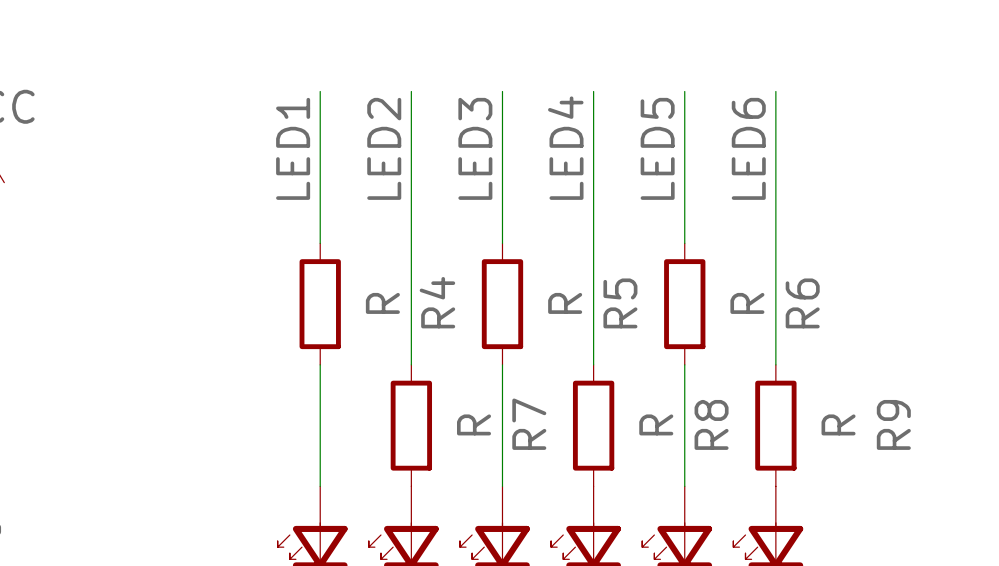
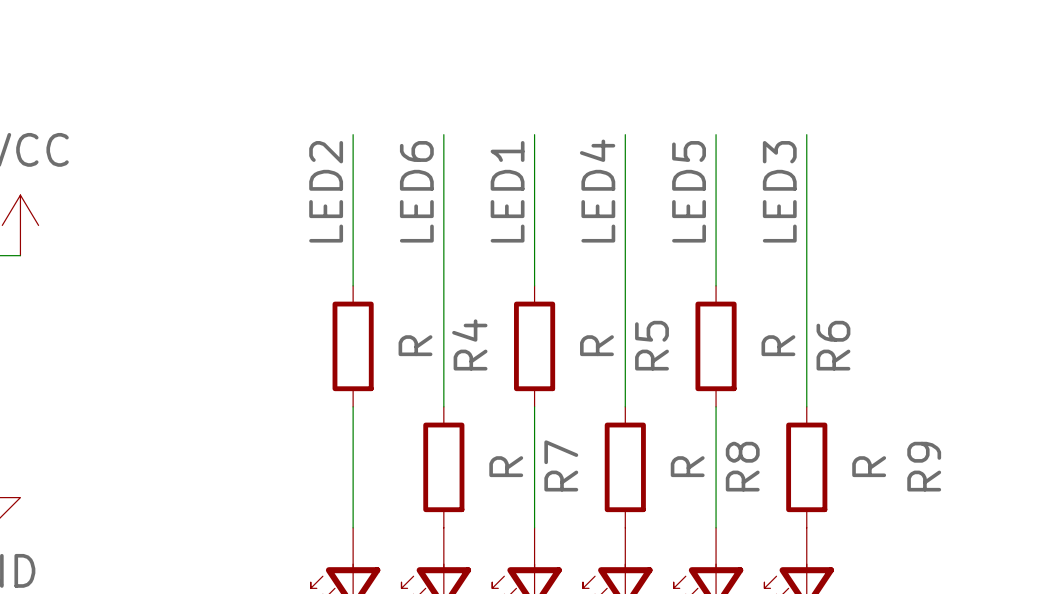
label: LED1 (293, 148) -> LED2 (326, 191)
label: LED2 (384, 148) -> LED6 (416, 191)
label: LED3 (475, 148) -> LED1 (507, 191)
label: LED6 (748, 148) -> LED3 (779, 191)

